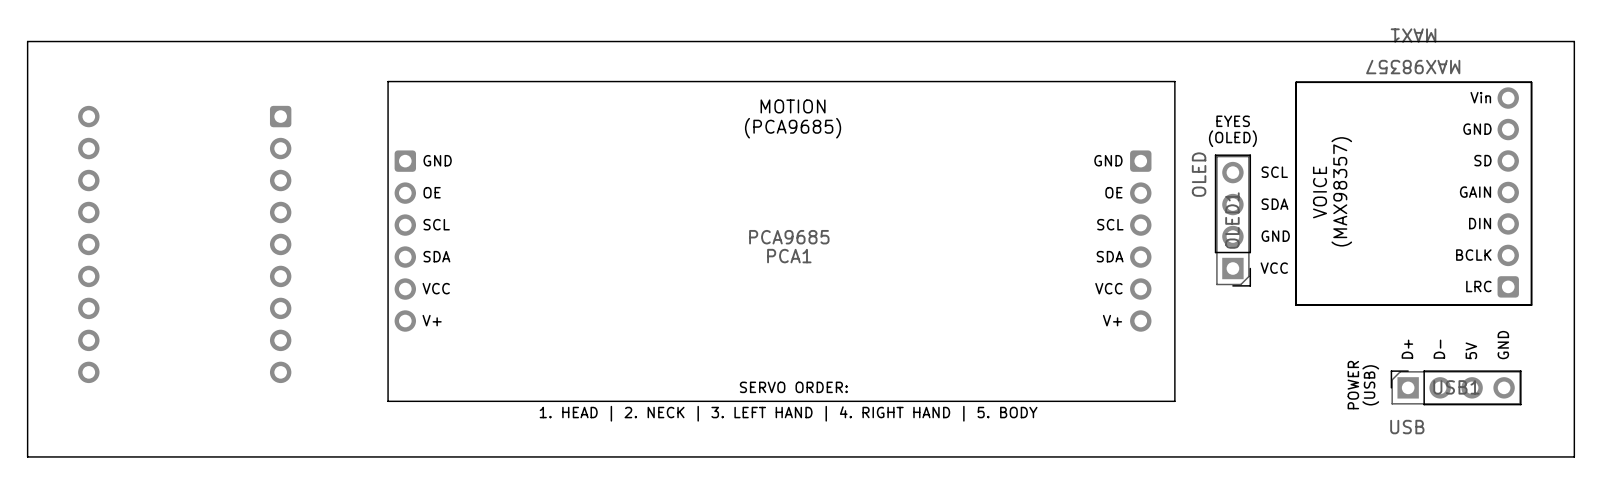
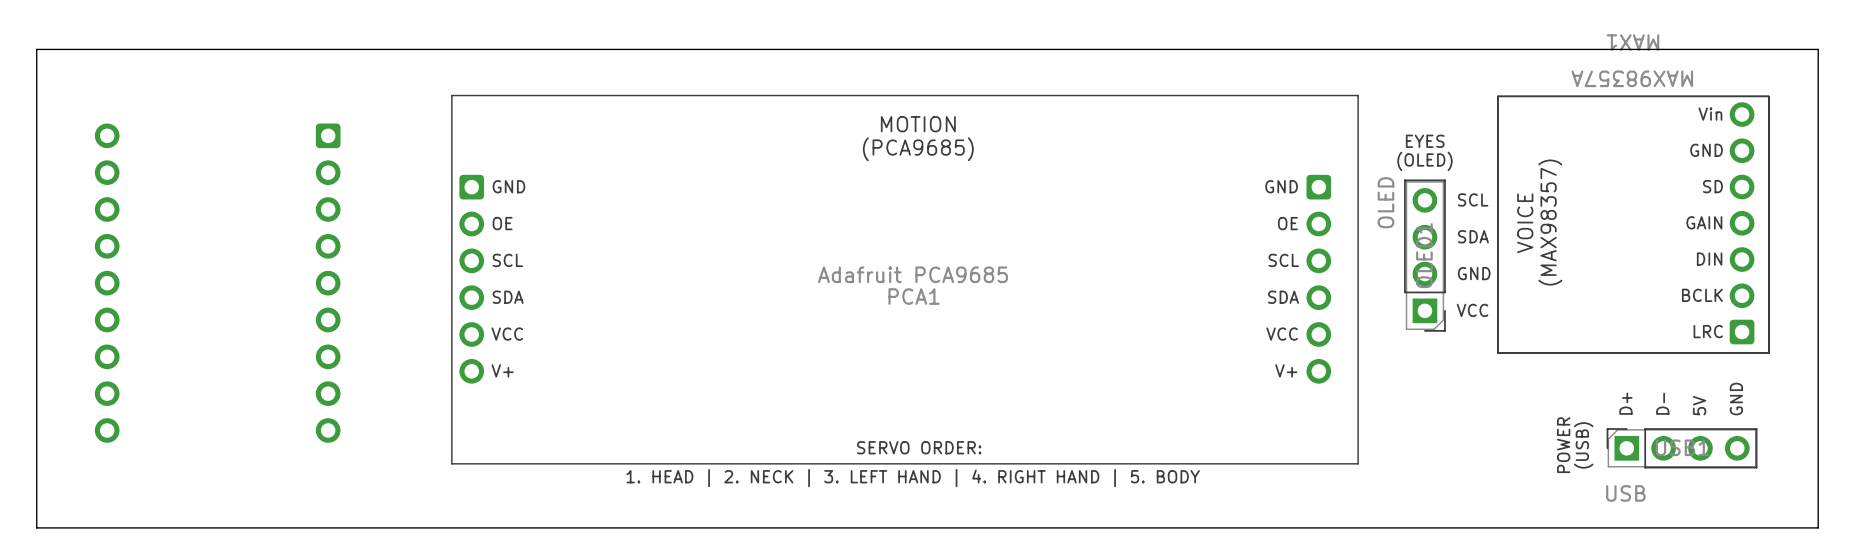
MAX1 value: MAX98357 (1413, 67) -> MAX98357A (1632, 78)
PCA1 value: PCA9685 (789, 237) -> Adafruit PCA9685 (912, 274)

